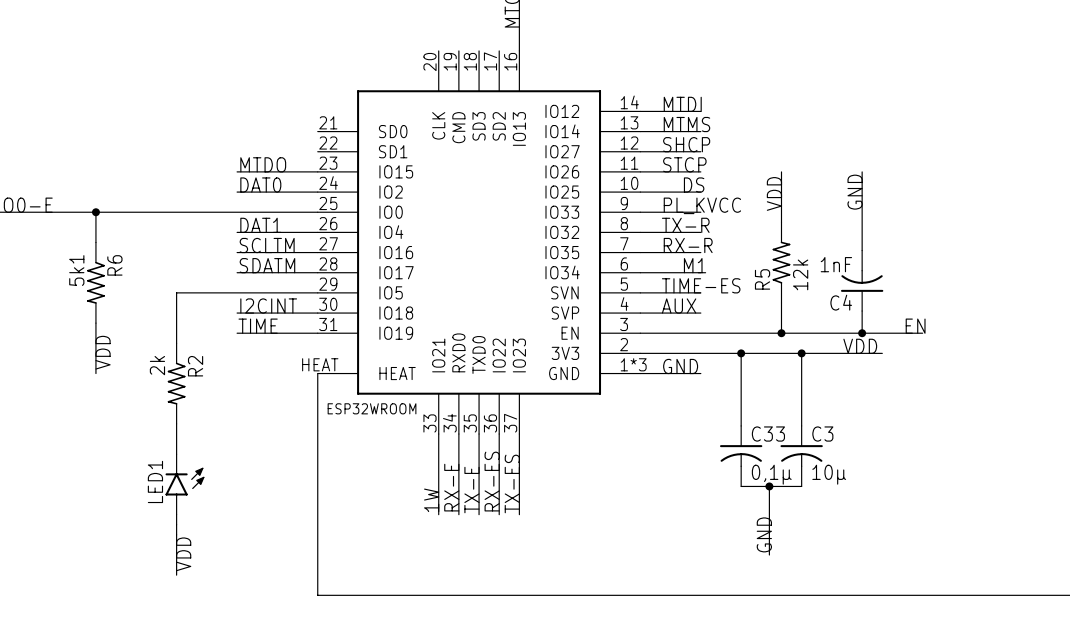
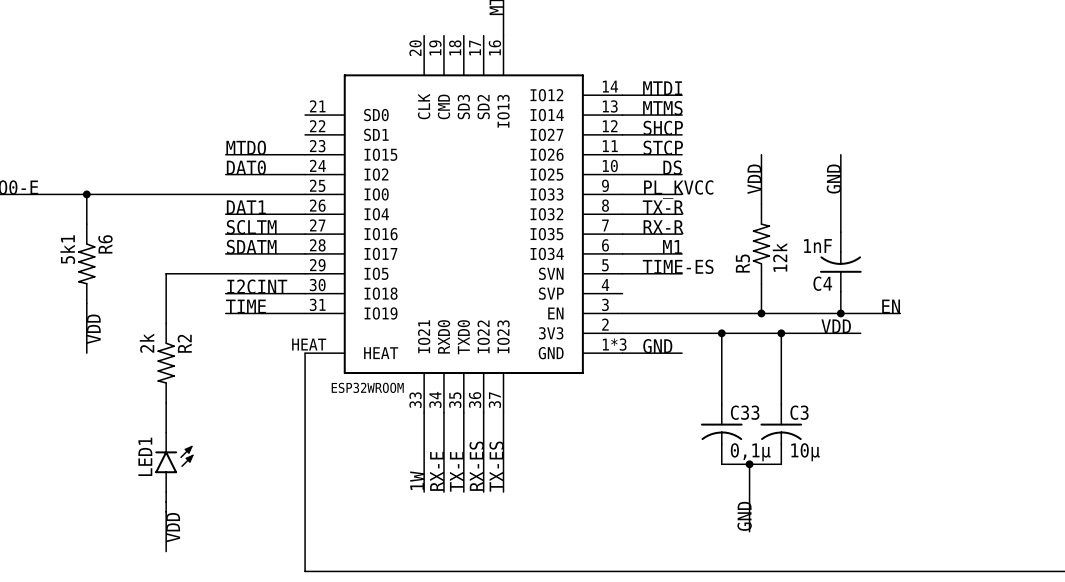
label: AUX (679, 305) -> none
wire: (640, 313) (700, 313) -> none

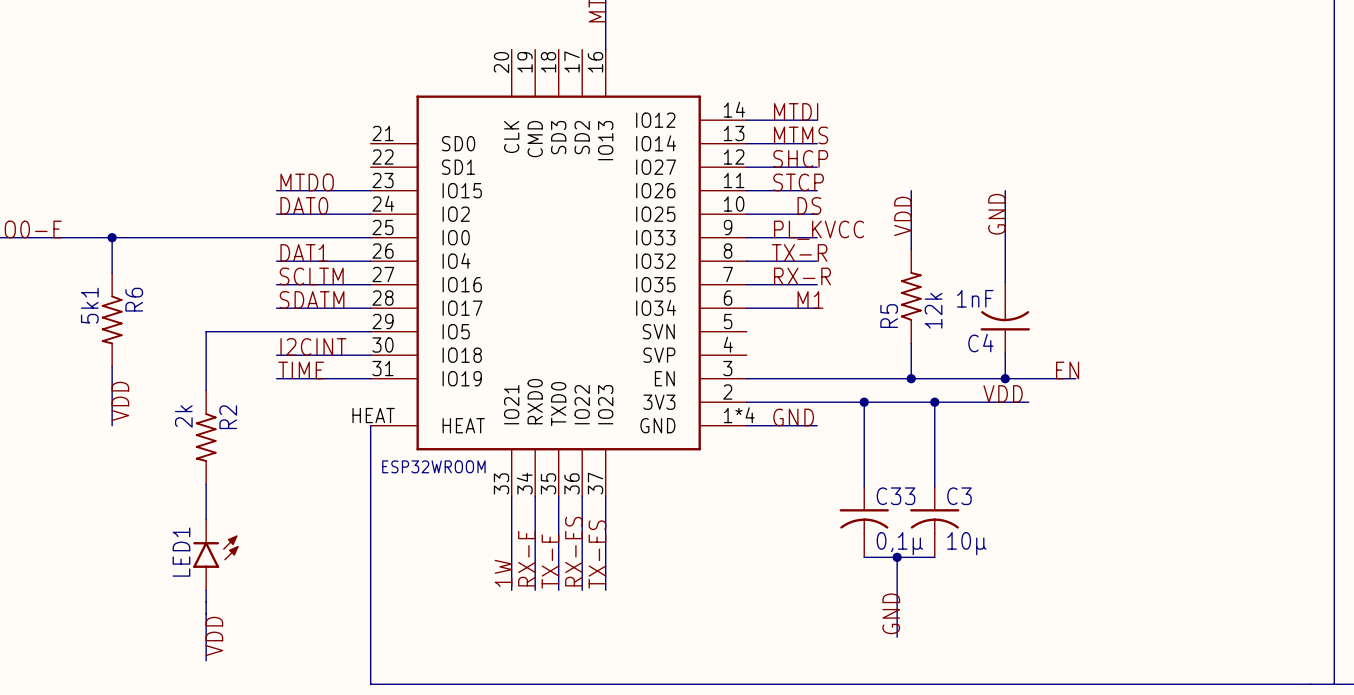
label: TIME-ES (678, 266) -> none
wire: (622, 273) (682, 273) -> none
part pin number: 1*3 (614, 344) -> 1*4 (739, 415)

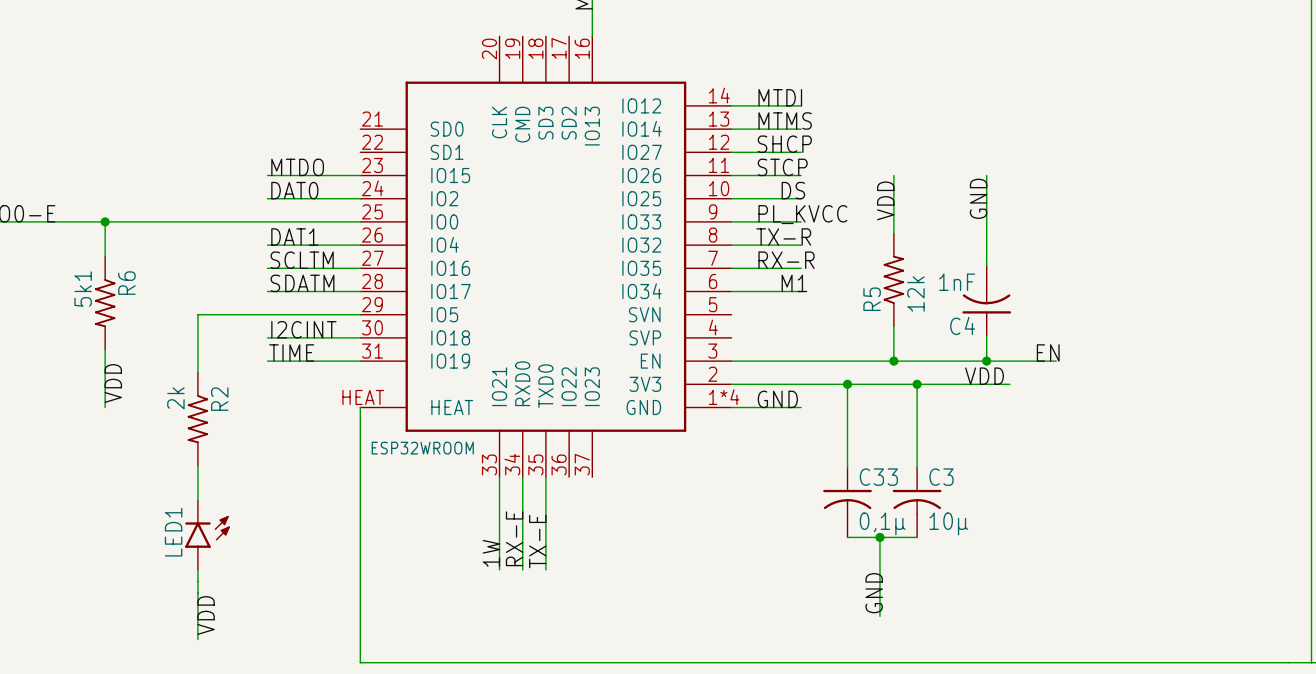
wire: (582, 496) (582, 590) -> none
wire: (605, 496) (605, 590) -> none
label: RX-ES (573, 551) -> none
label: TX-ES (597, 554) -> none

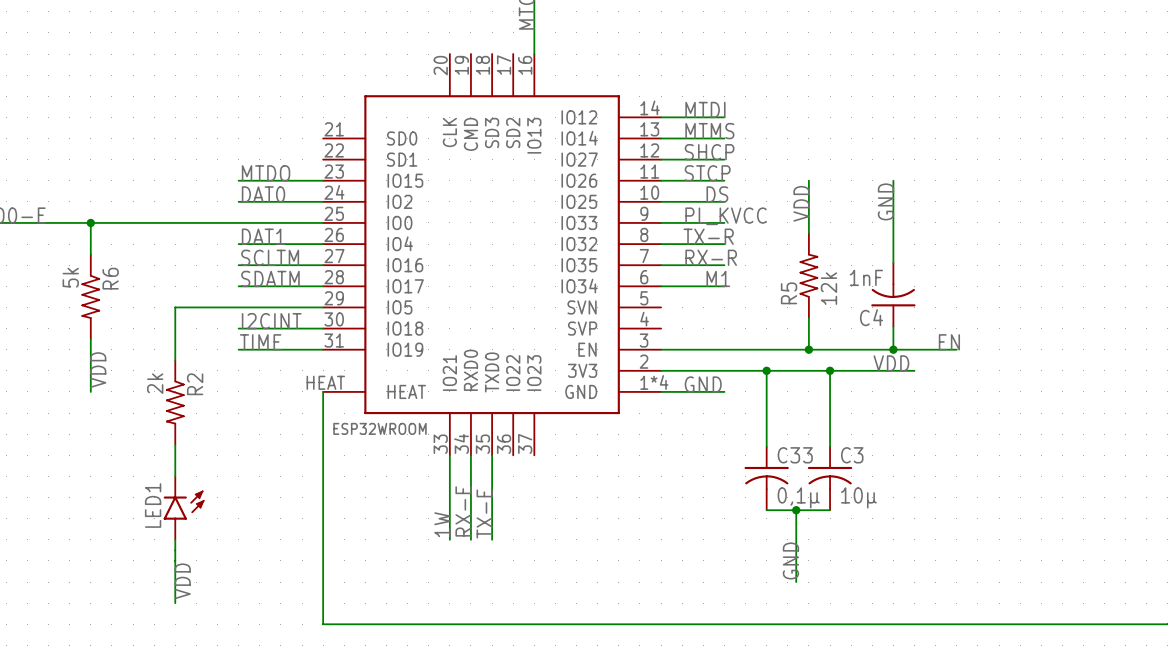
R6 value: 5k1 (83, 289) -> 5k (70, 277)

